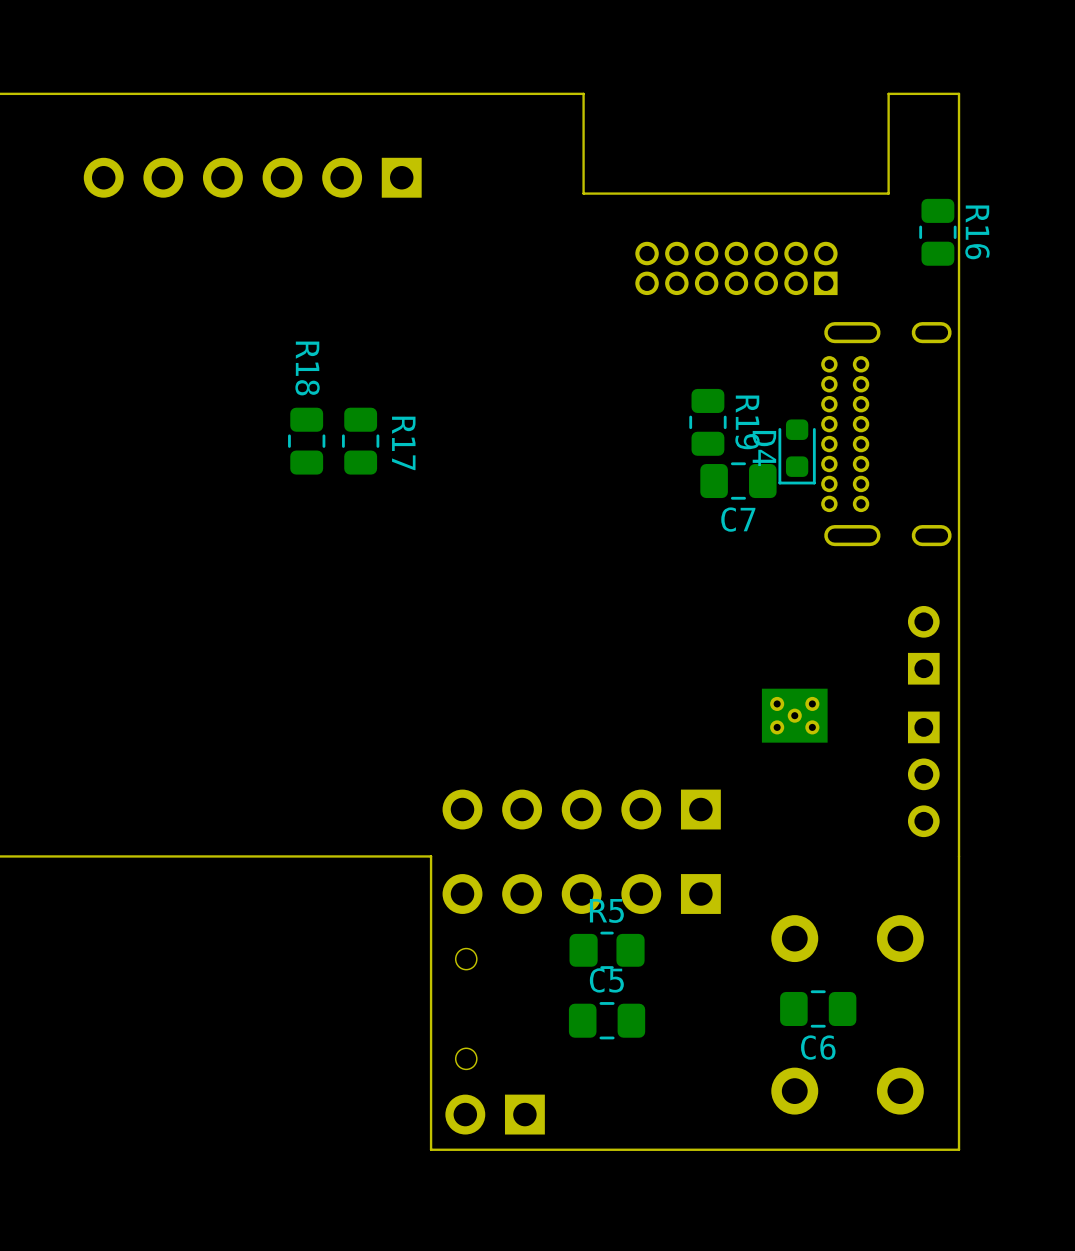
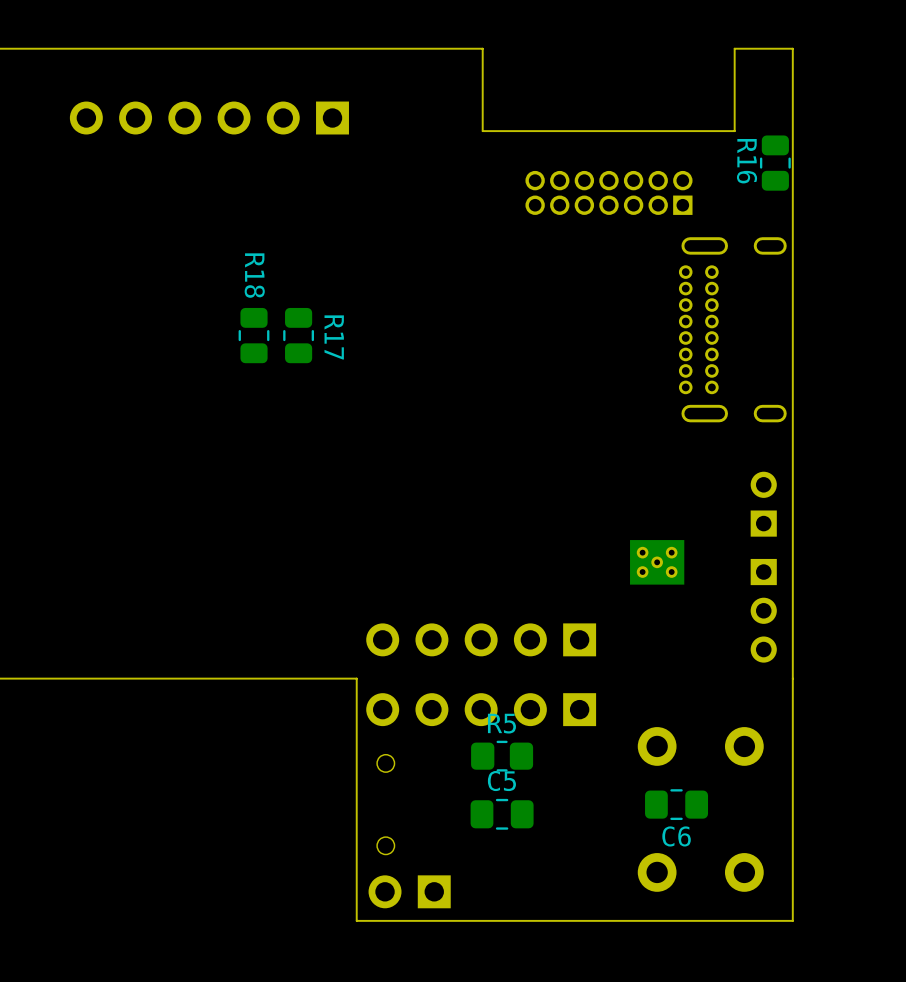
R16 name position: R16 (977, 232) -> R16 (747, 161)
R19: (707, 422) -> none
D4: (797, 451) -> none
C7: (738, 481) -> none

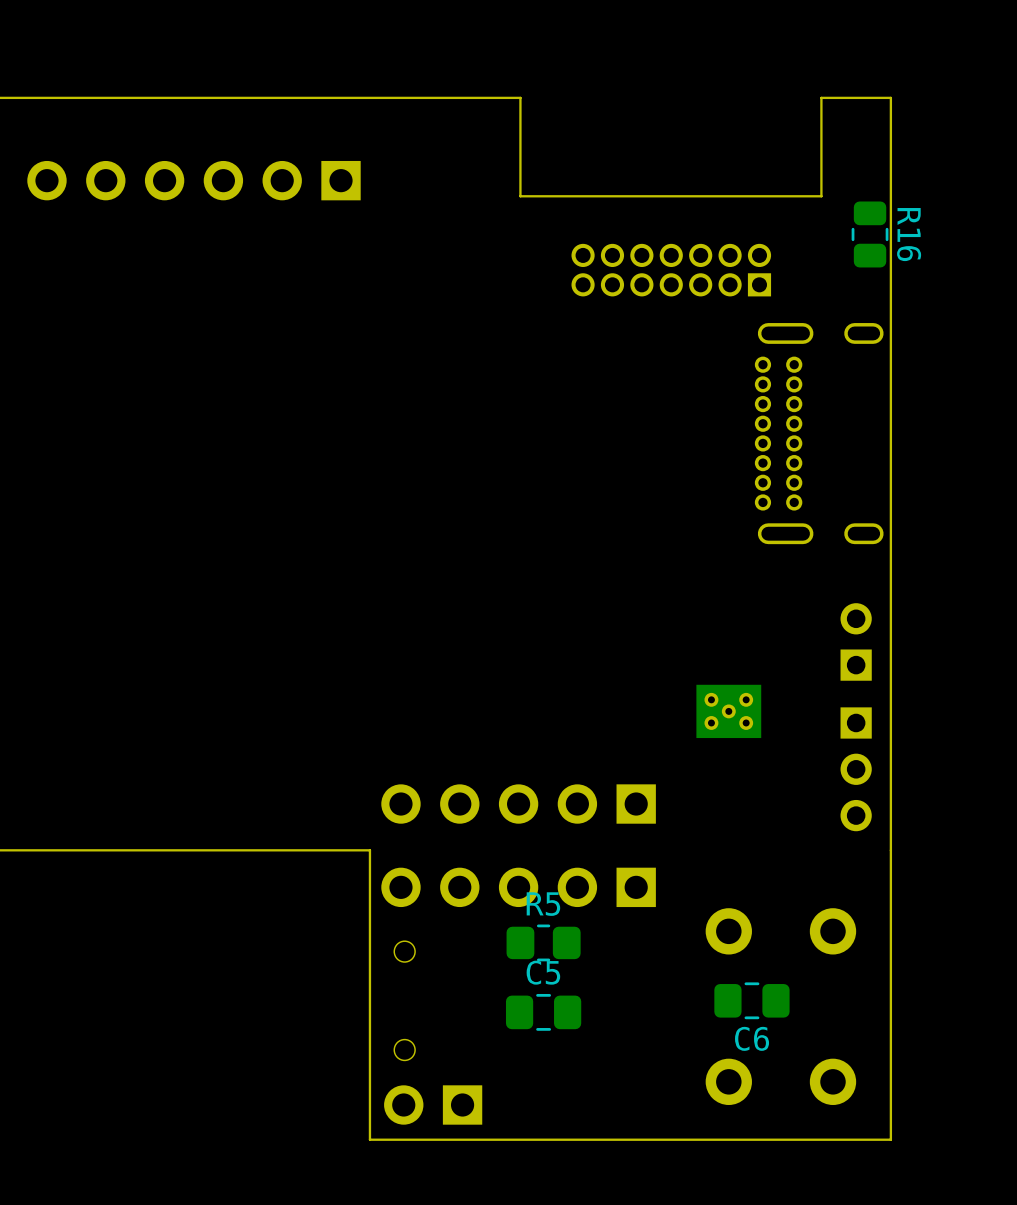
R16 name position: R16 (747, 161) -> R16 (909, 234)
R18: (254, 335) -> none
R17: (298, 335) -> none

